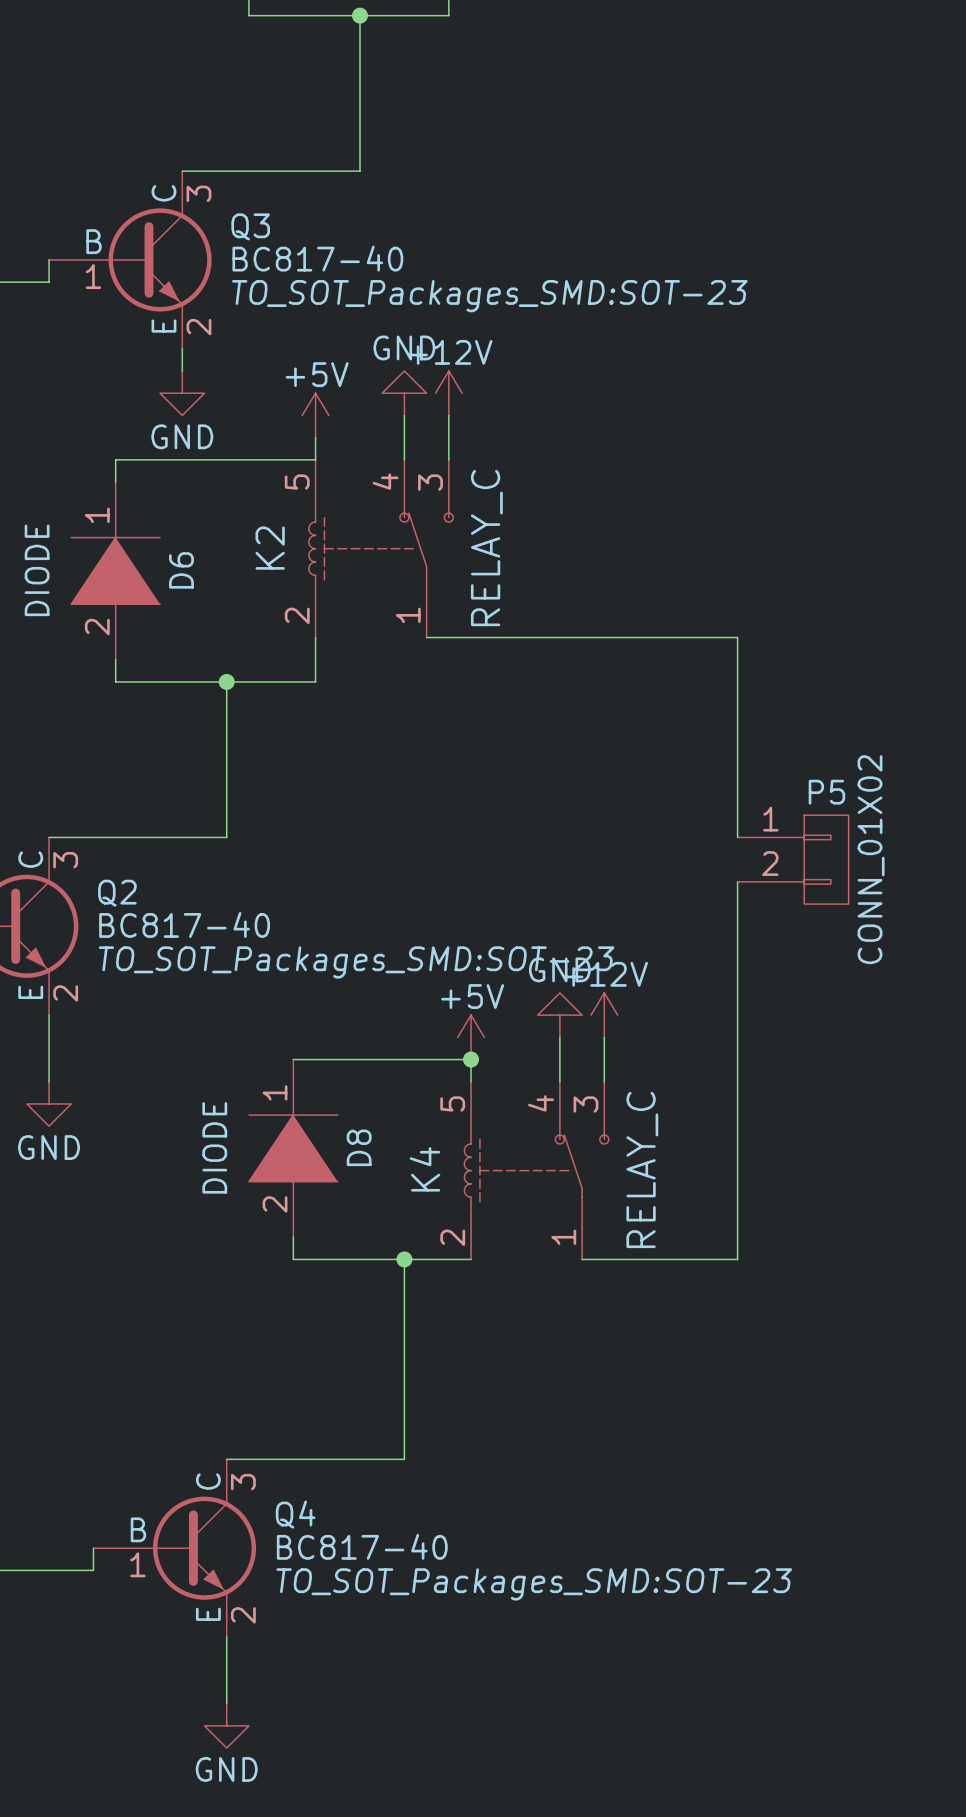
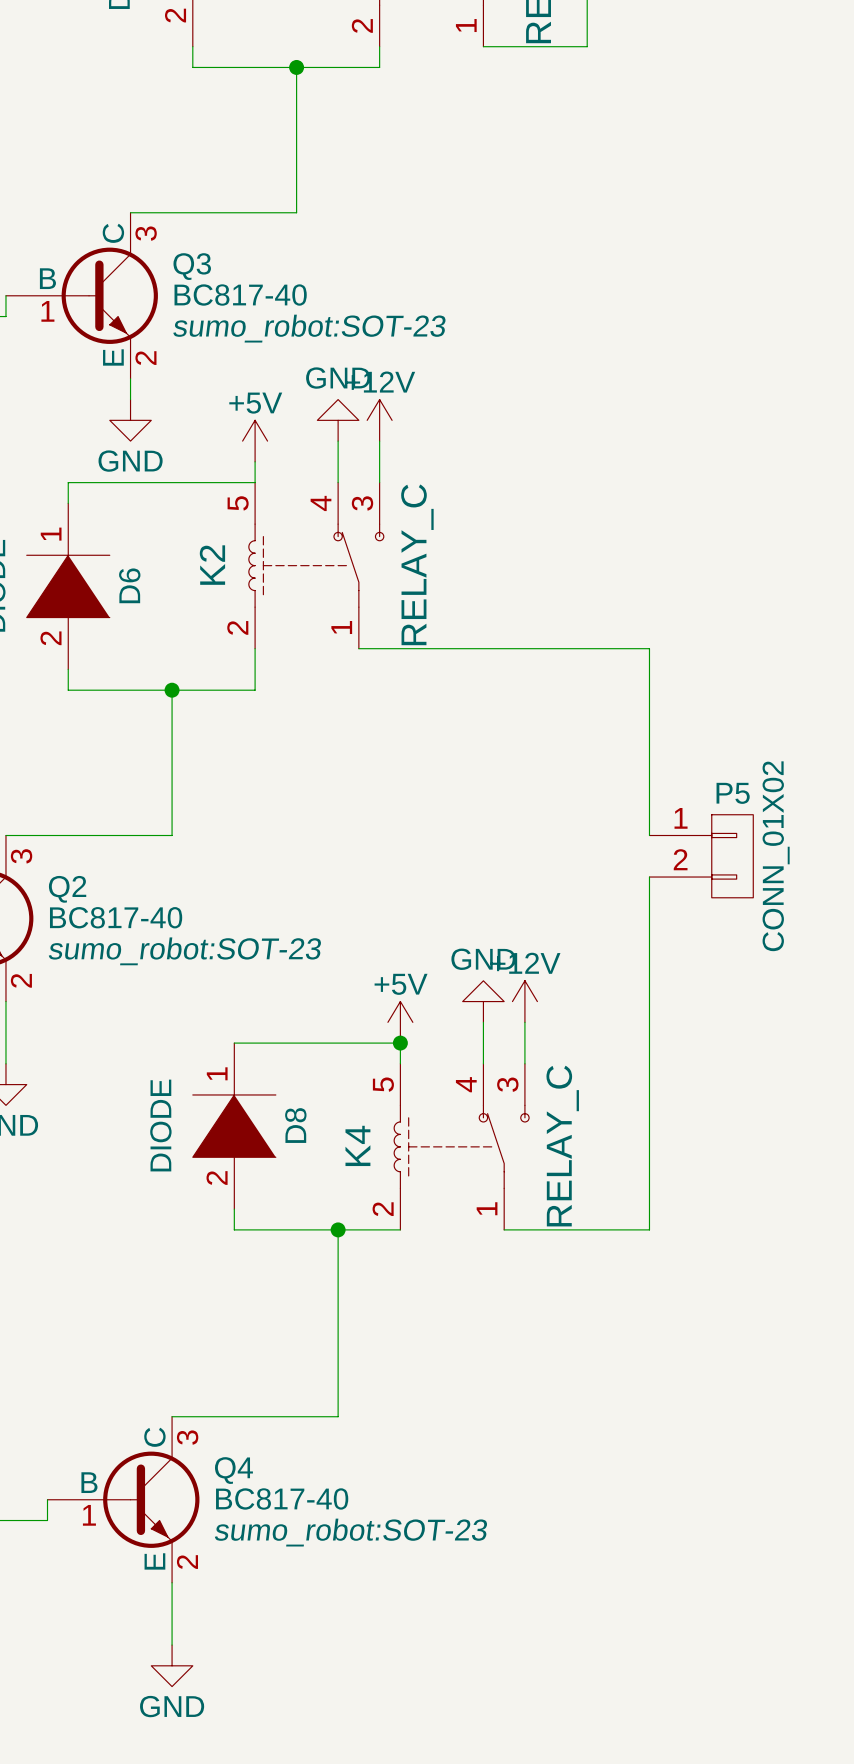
Q3 text: TO_SOT_Packages_SMD:SOT-23 (489, 296) -> sumo_robot:SOT-23 (309, 328)
Q2 text: TO_SOT_Packages_SMD:SOT-23 (356, 962) -> sumo_robot:SOT-23 (185, 951)
Q4 text: TO_SOT_Packages_SMD:SOT-23 (534, 1584) -> sumo_robot:SOT-23 (351, 1532)

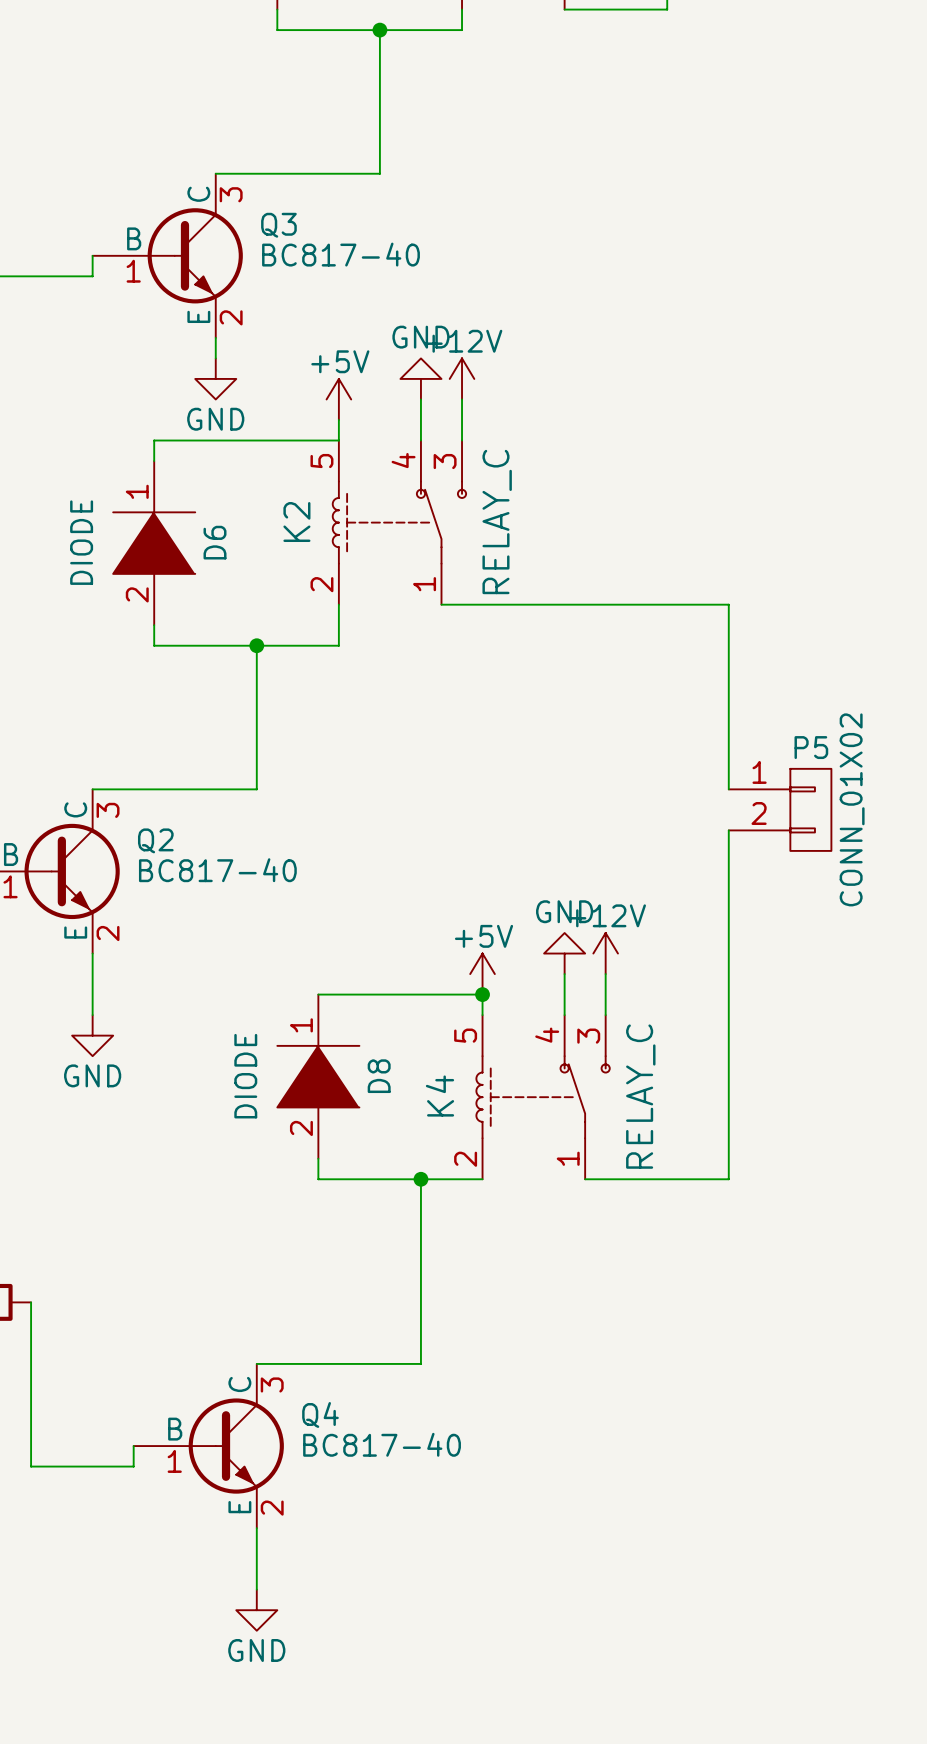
Q3 text: sumo_robot:SOT-23 (309, 328) -> none
Q2 text: sumo_robot:SOT-23 (185, 951) -> none
Q4 text: sumo_robot:SOT-23 (351, 1532) -> none

